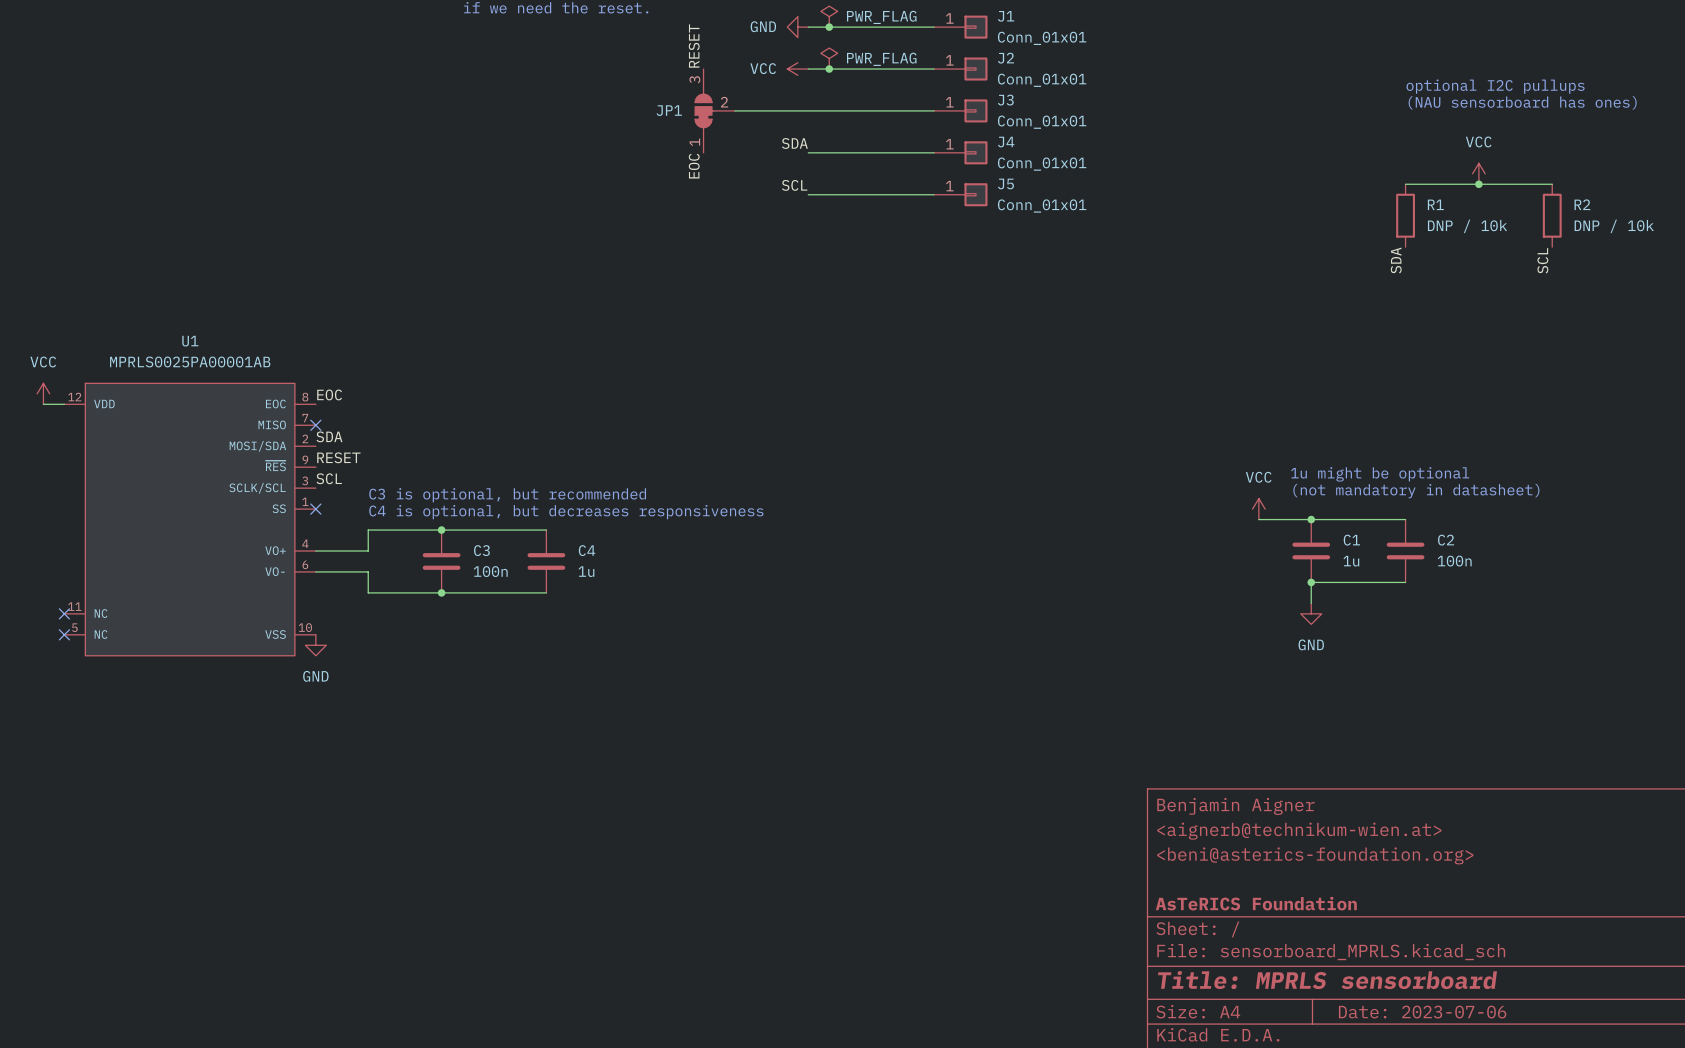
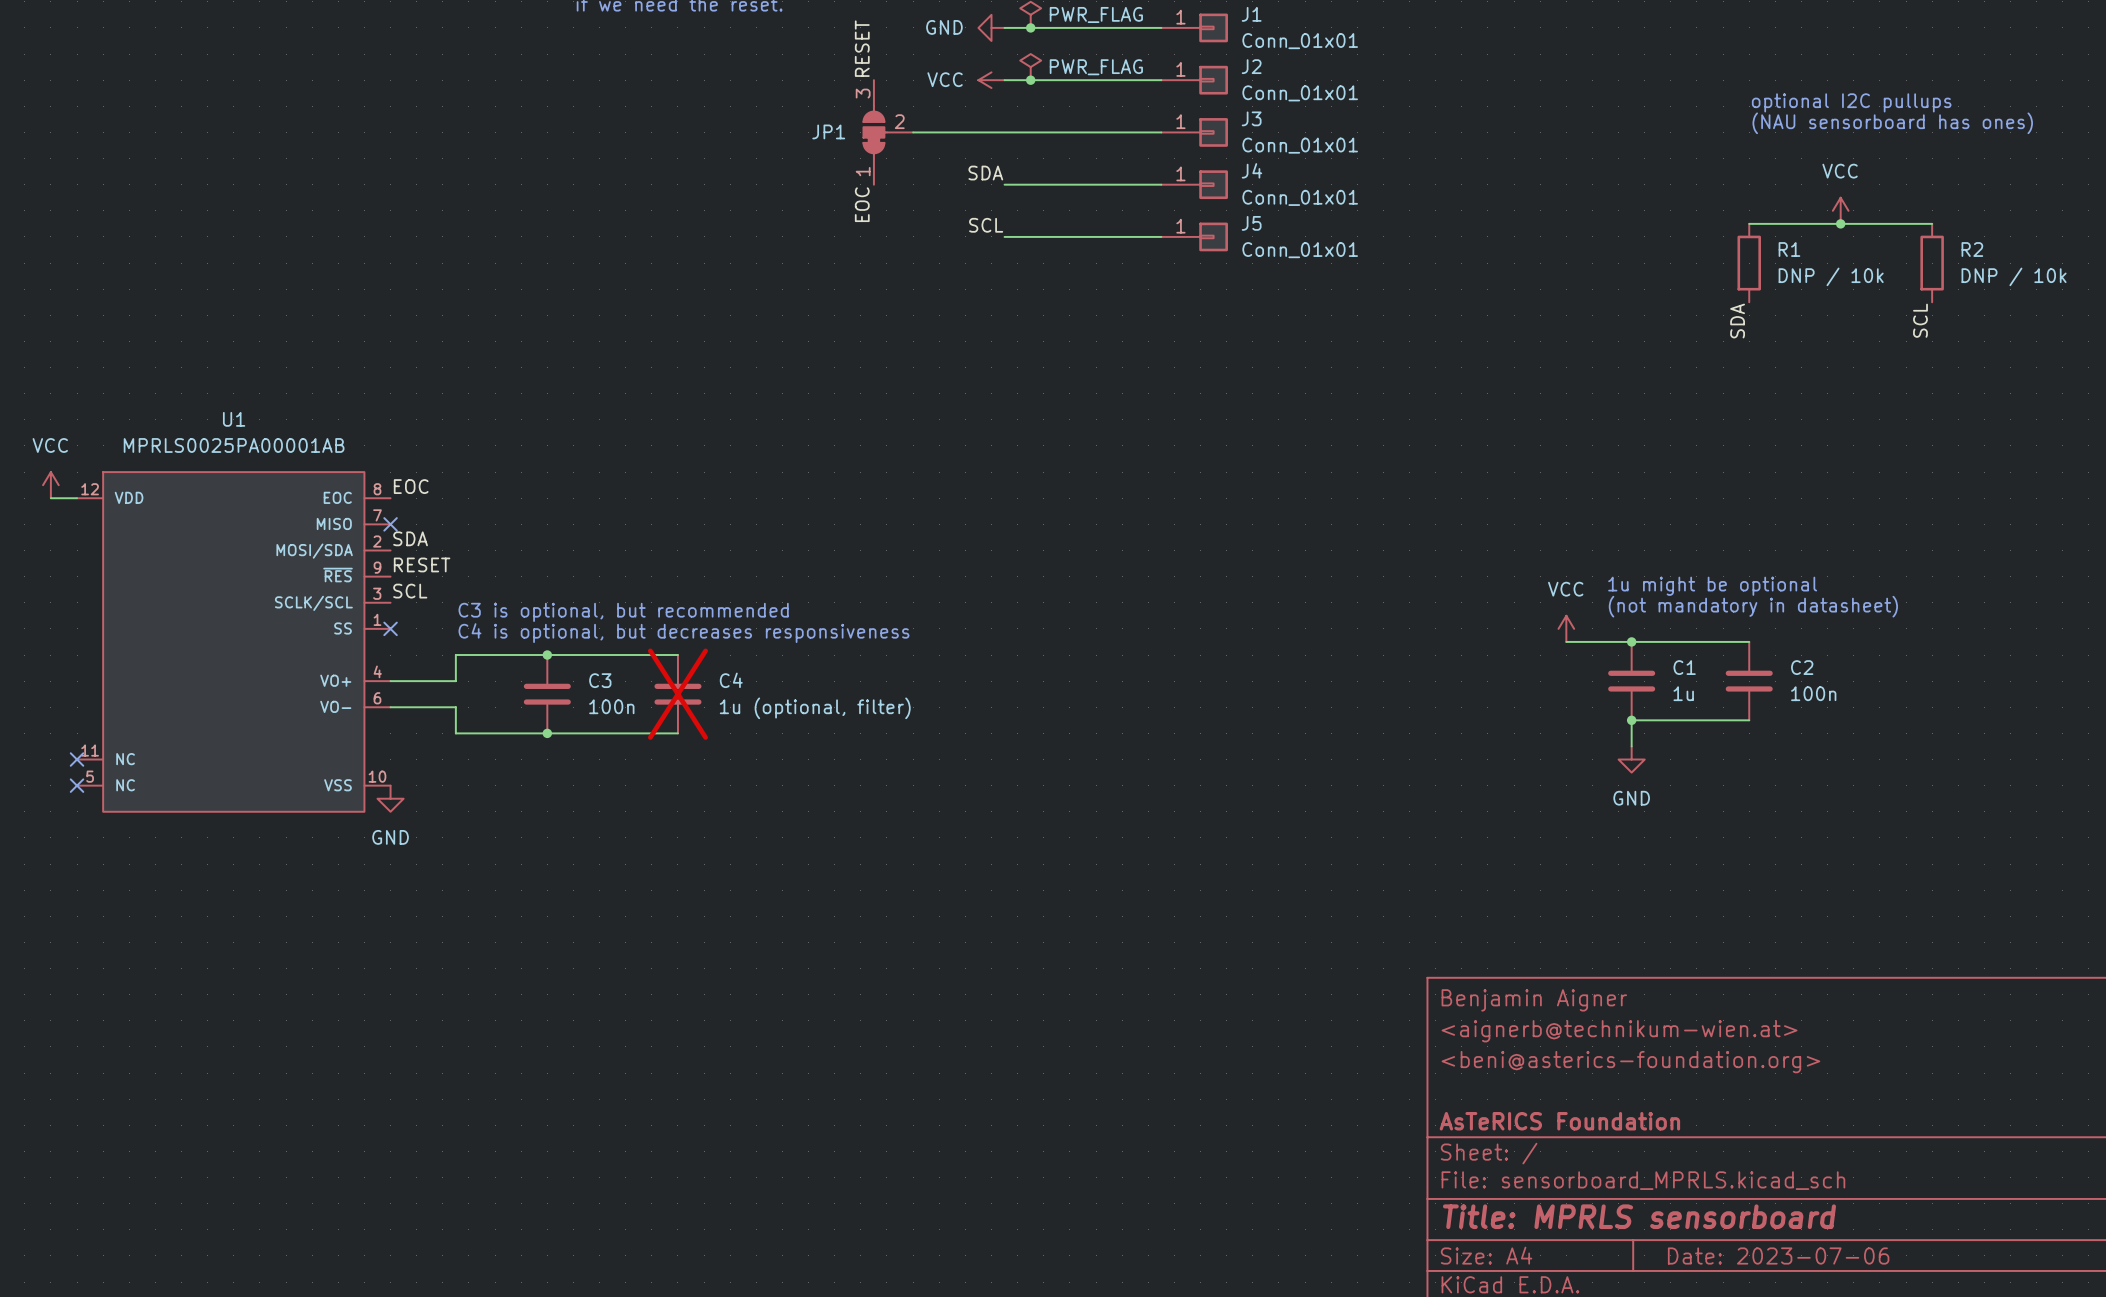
C4 do-not-place cross: none -> (677, 694)
C4 value: 1u (586, 571) -> 1u (optional, filter) (815, 708)

